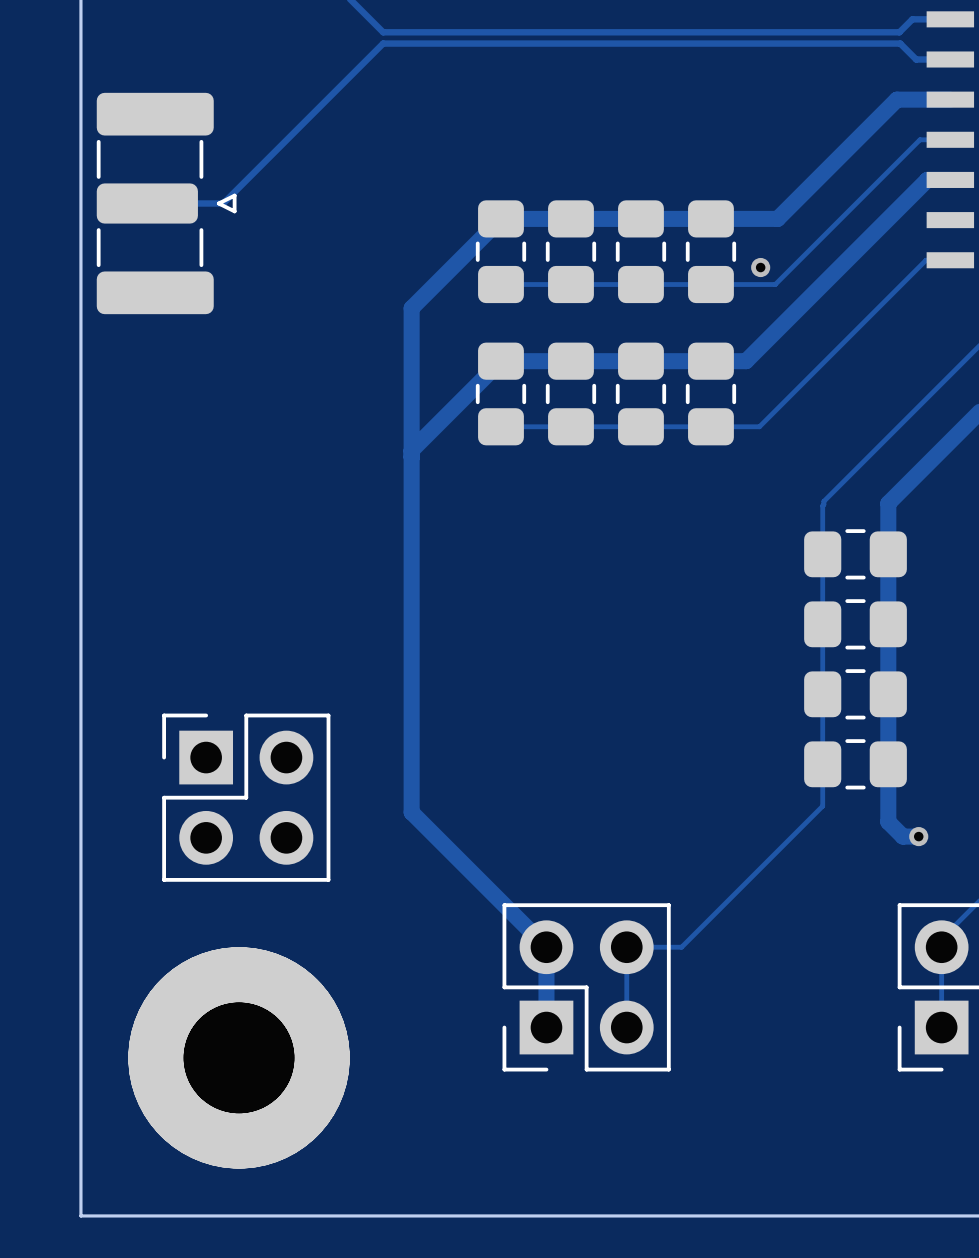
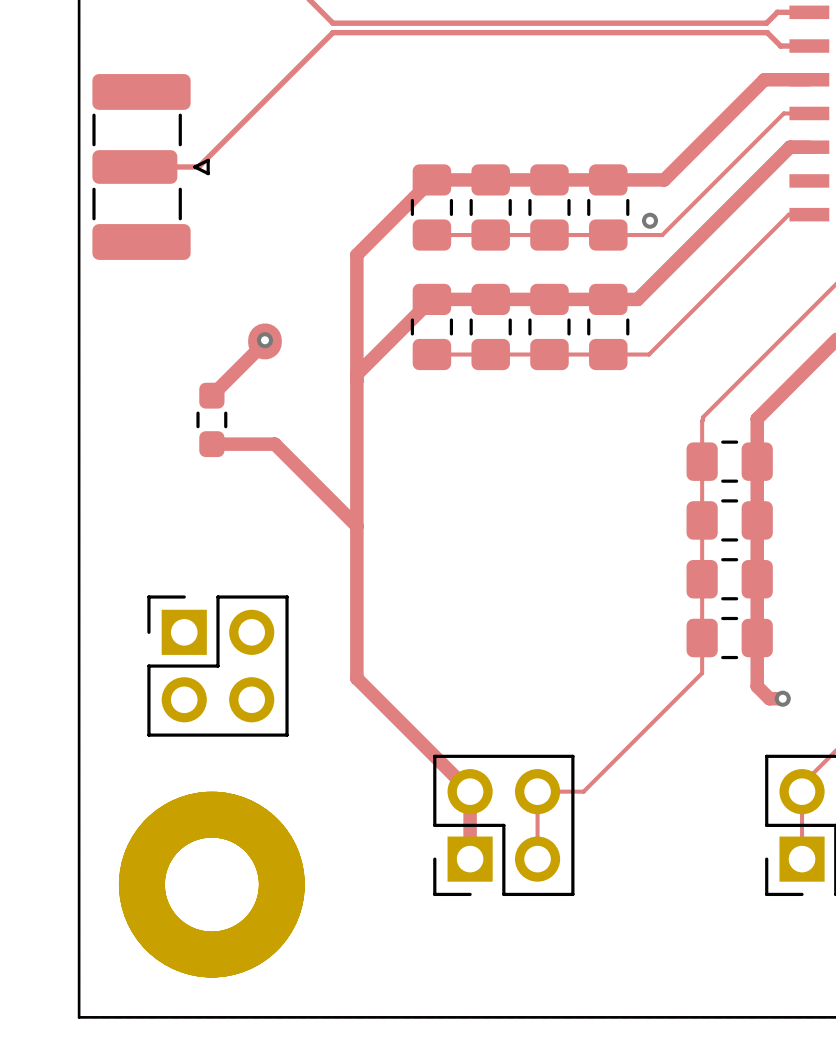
track: none -> (264, 340) (264, 342) (211, 395)
via: none -> (264, 340)
part: none -> (211, 419)
track: none -> (211, 444) (274, 444) (356, 526)

